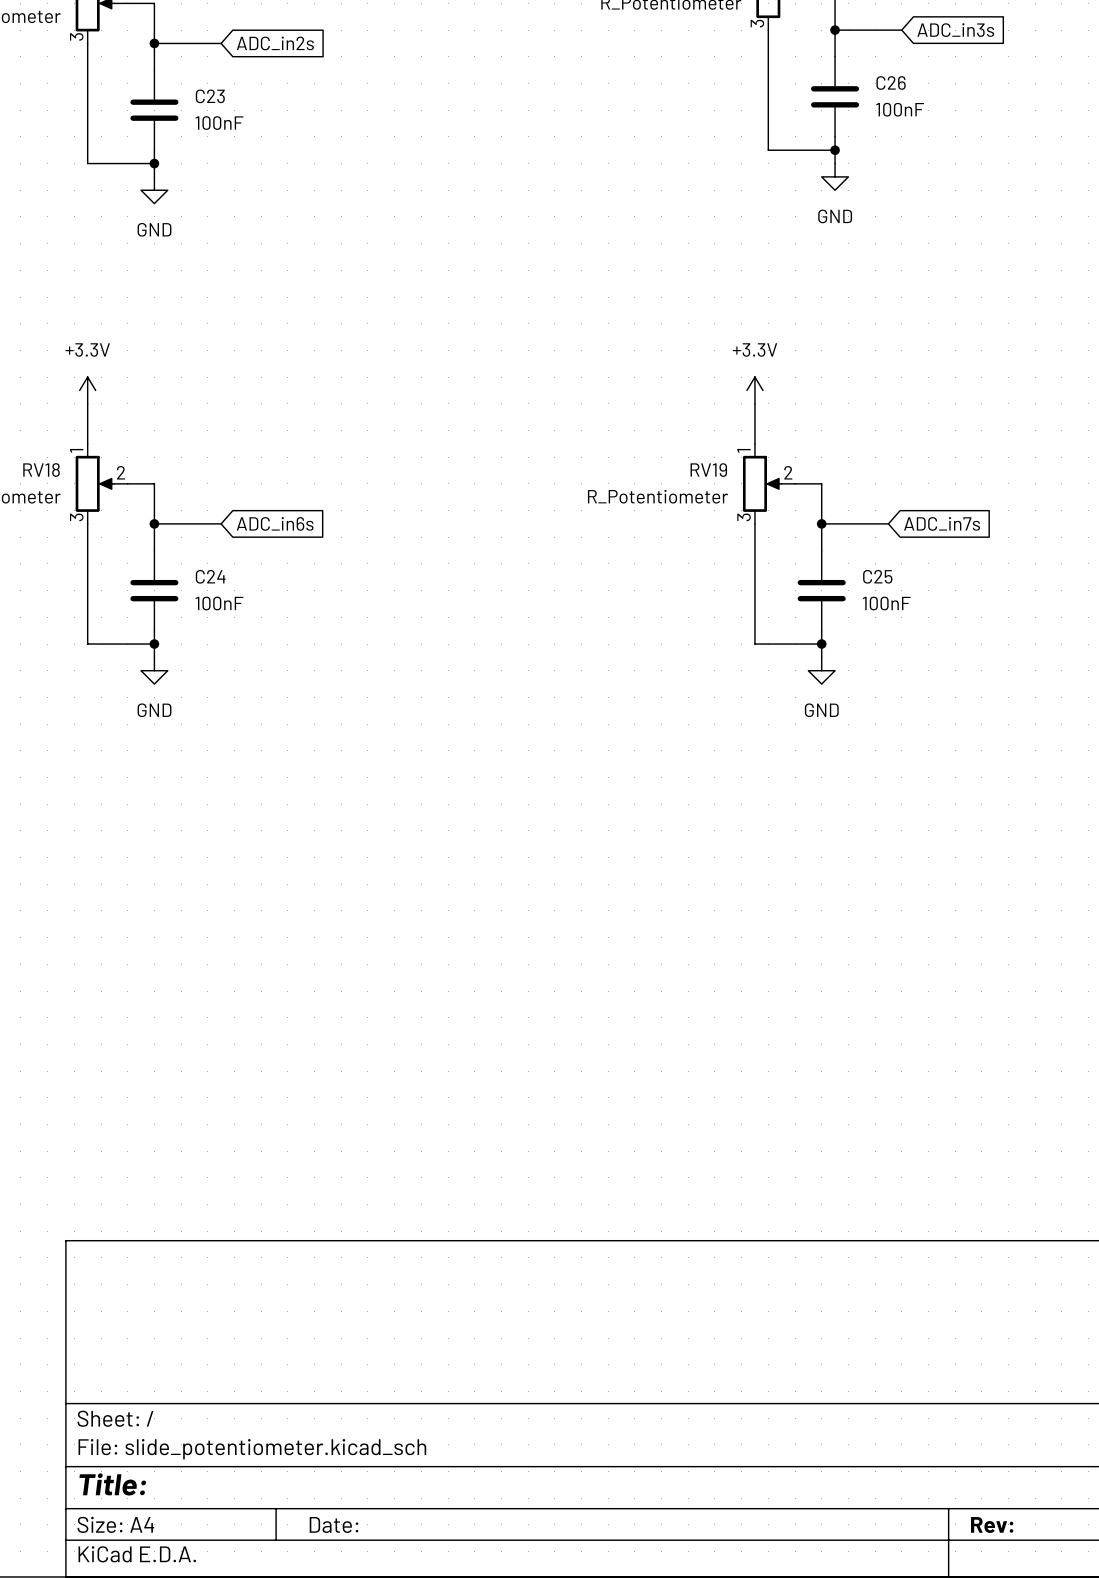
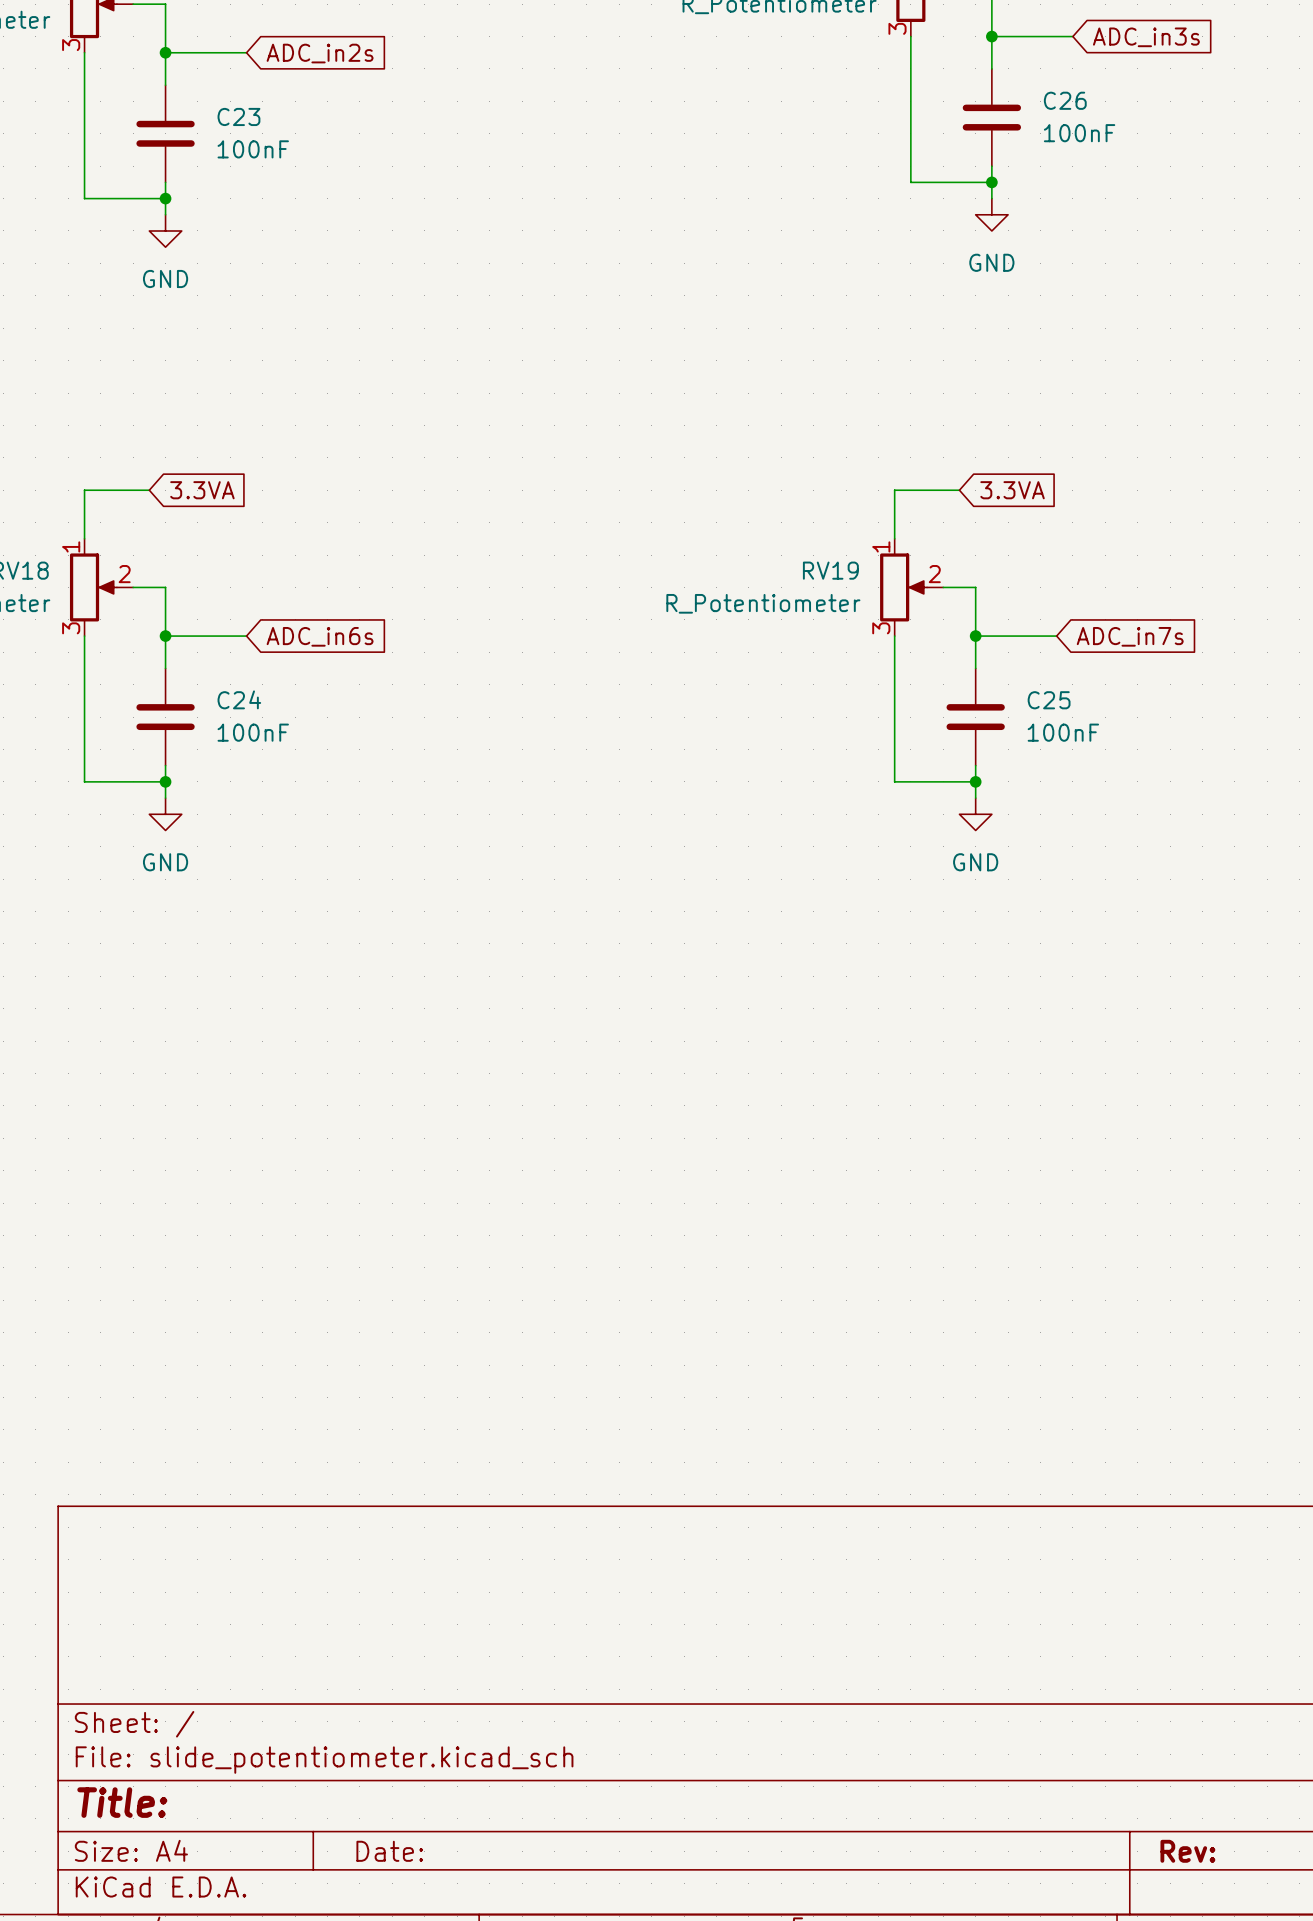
power symbol: +3.3V (87, 390) -> none
power symbol: +3.3V (754, 390) -> none
wire: none -> (84, 490) (149, 490)
global label: none -> 3.3VA (202, 490)
wire: none -> (894, 490) (959, 490)
global label: none -> 3.3VA (1012, 490)

